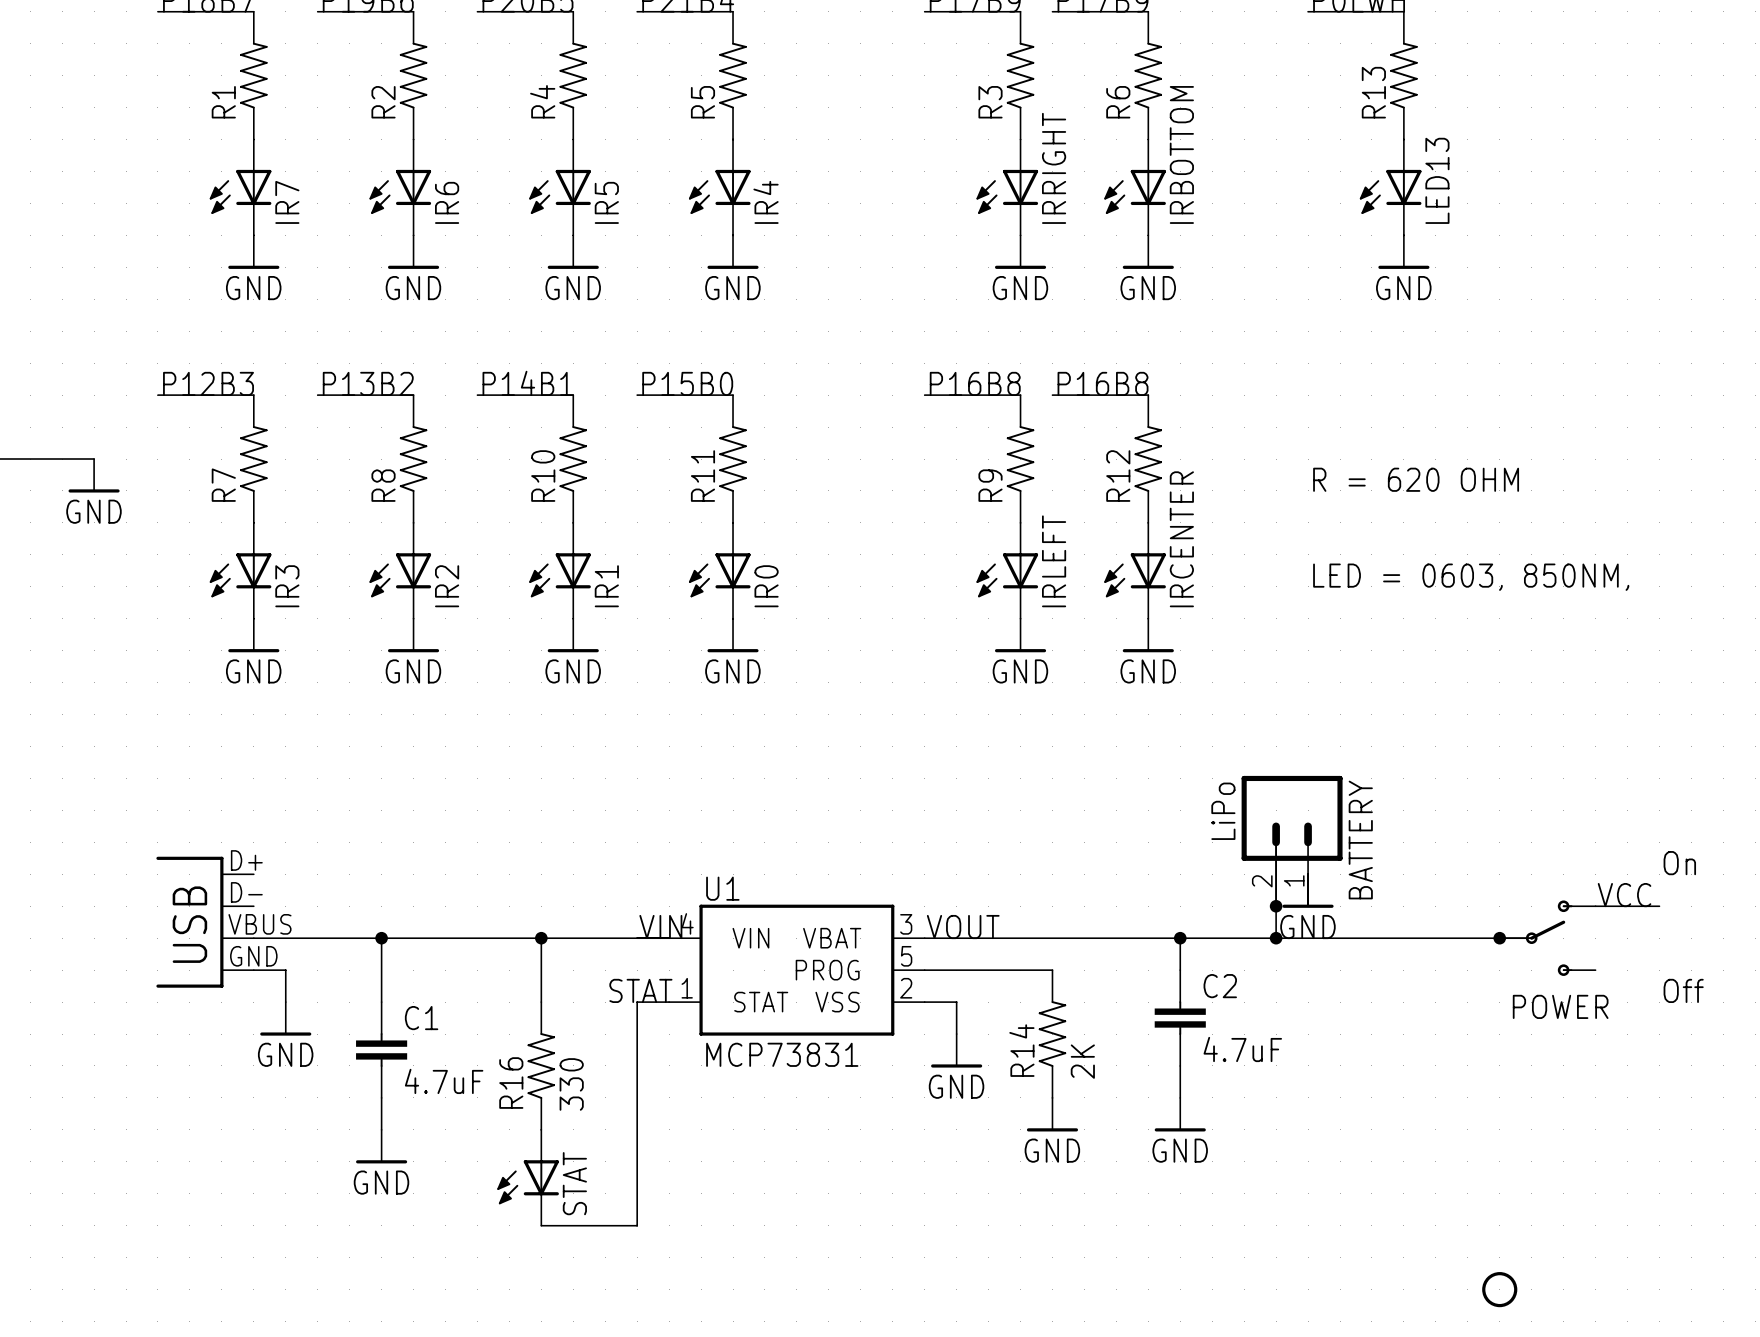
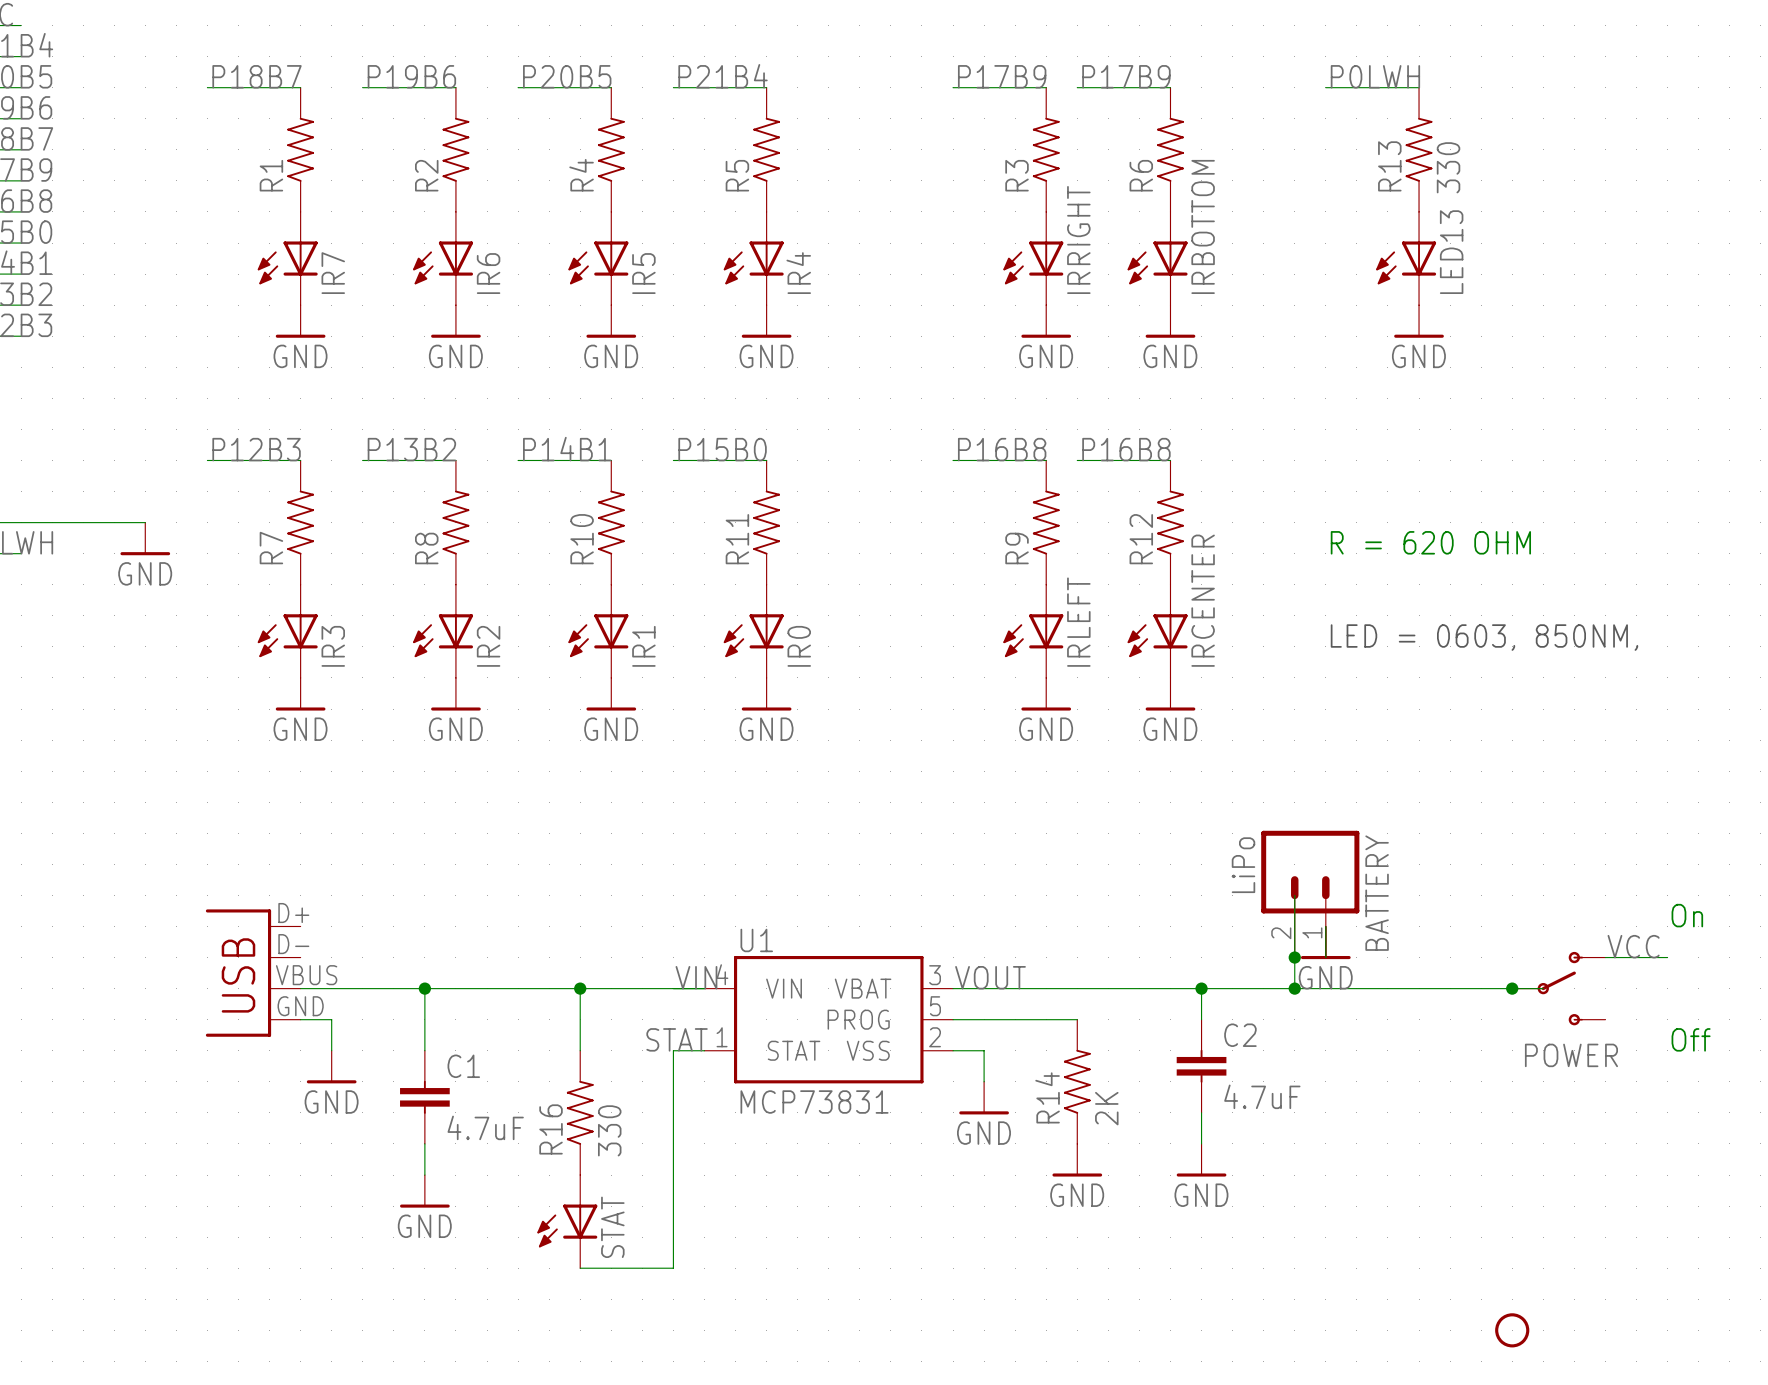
R13 value: none -> 330 (1448, 167)

